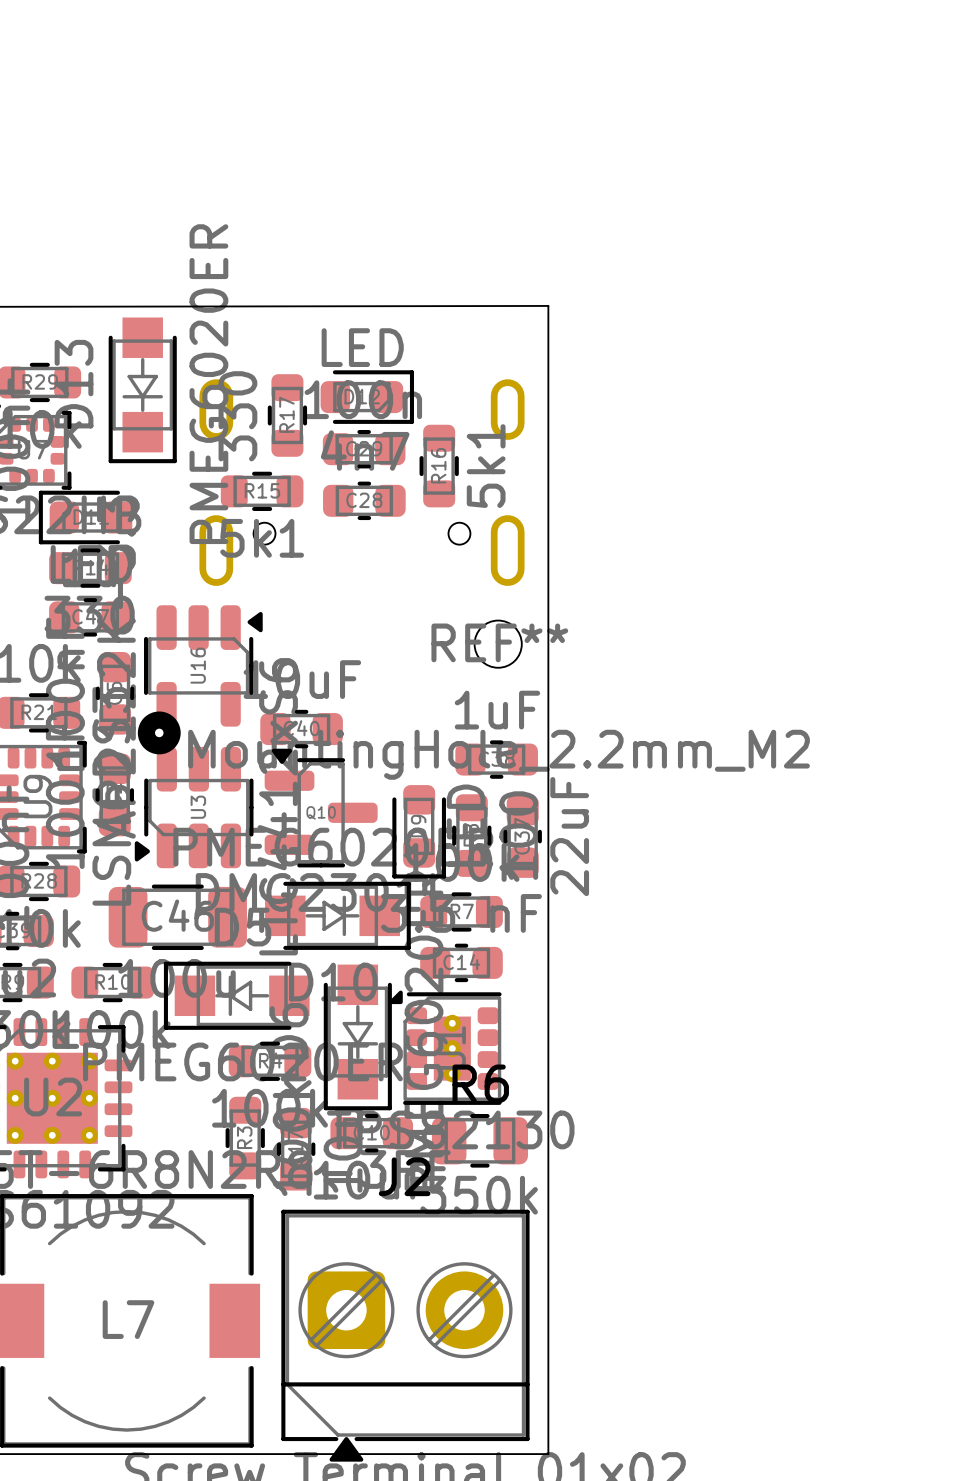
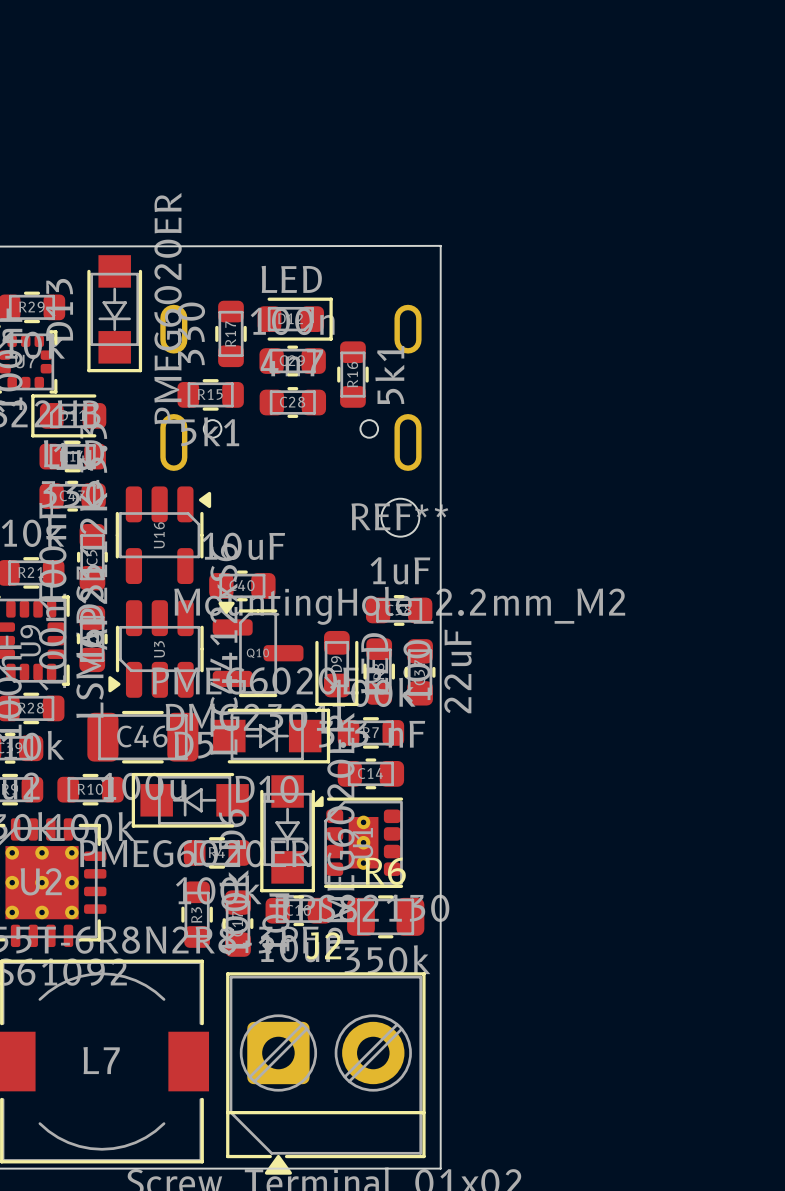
part: (159, 732) -> none

